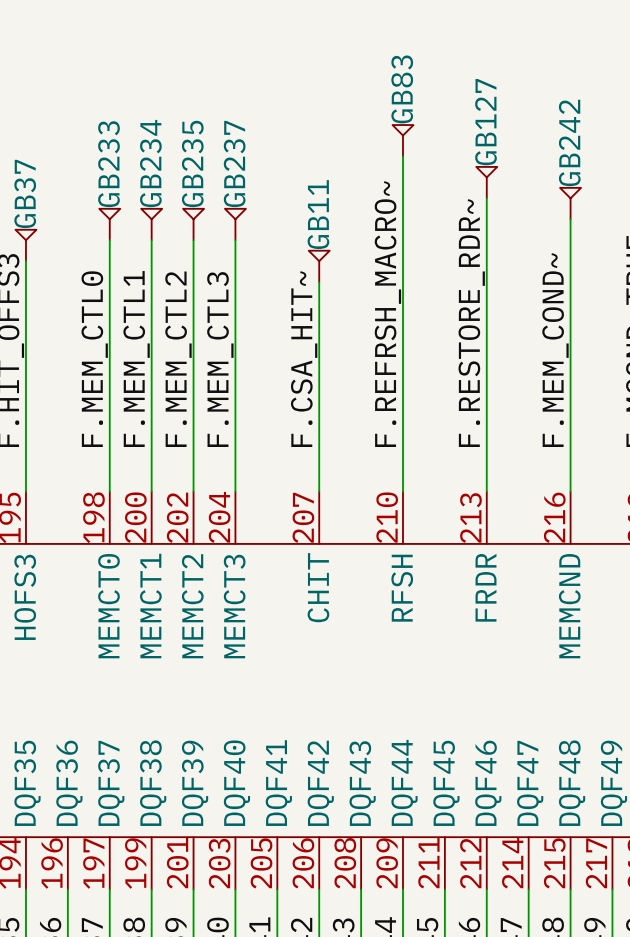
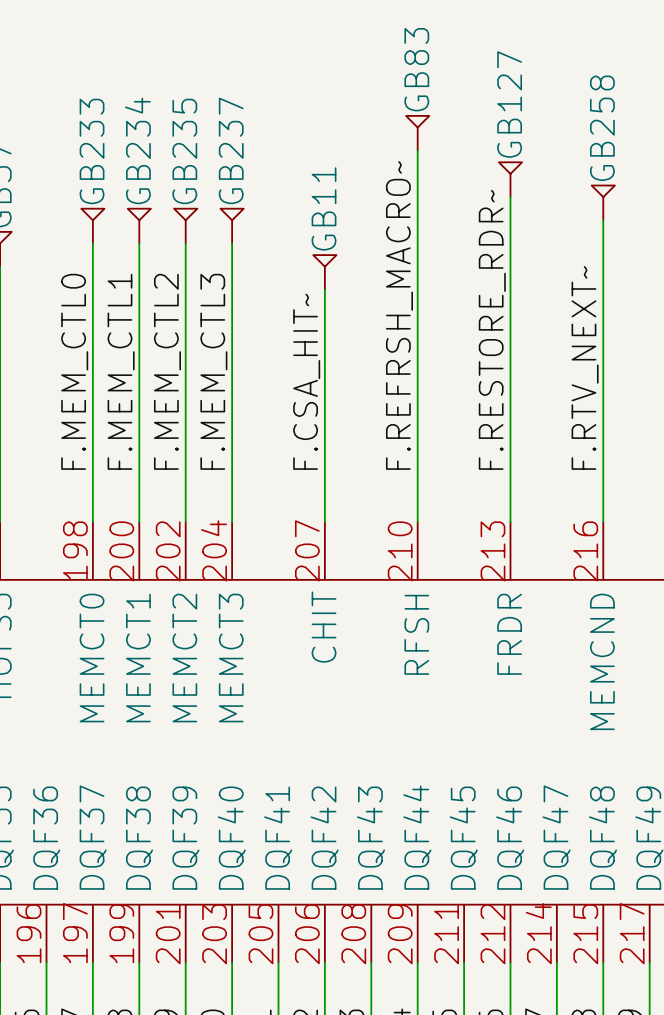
GB242 name: GB242 (569, 142) -> GB258 (602, 128)
label: F.MEM_COND~ (555, 350) -> F.RTV_NEXT~ (585, 367)

